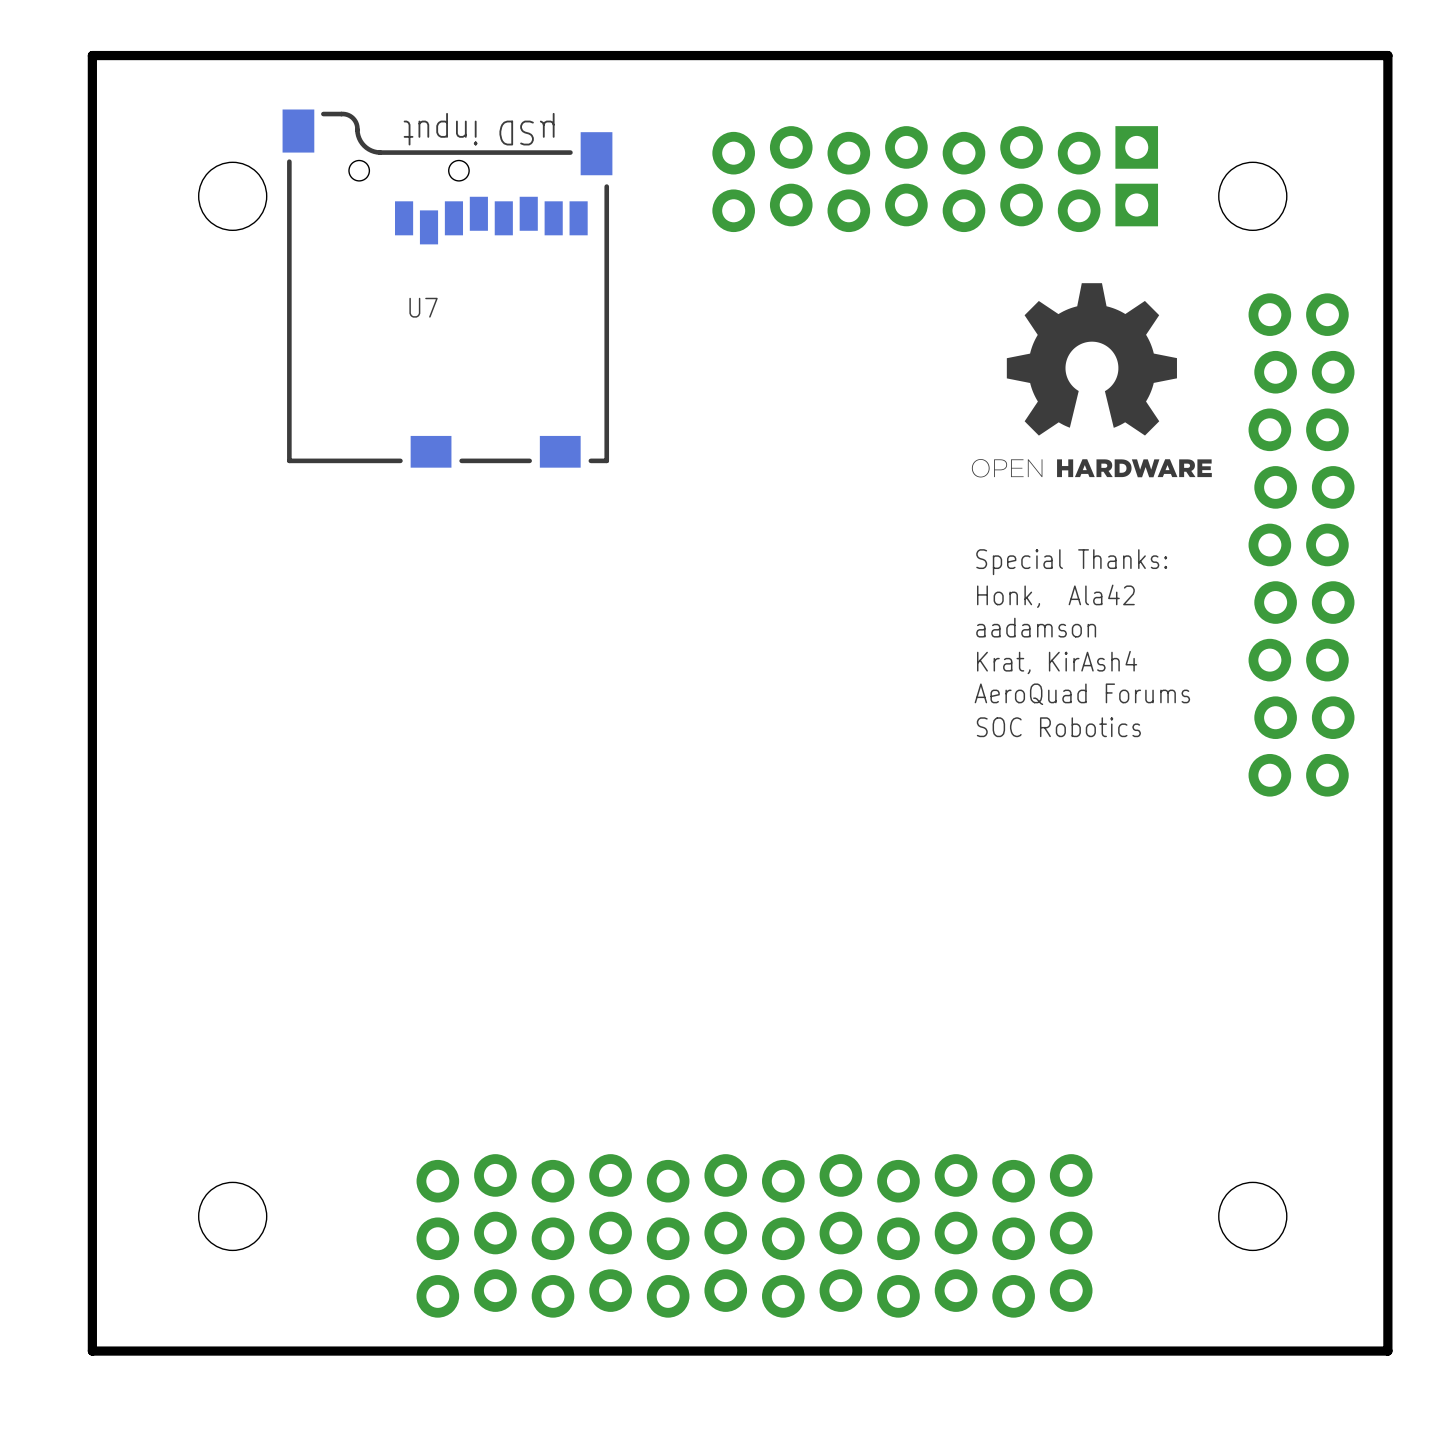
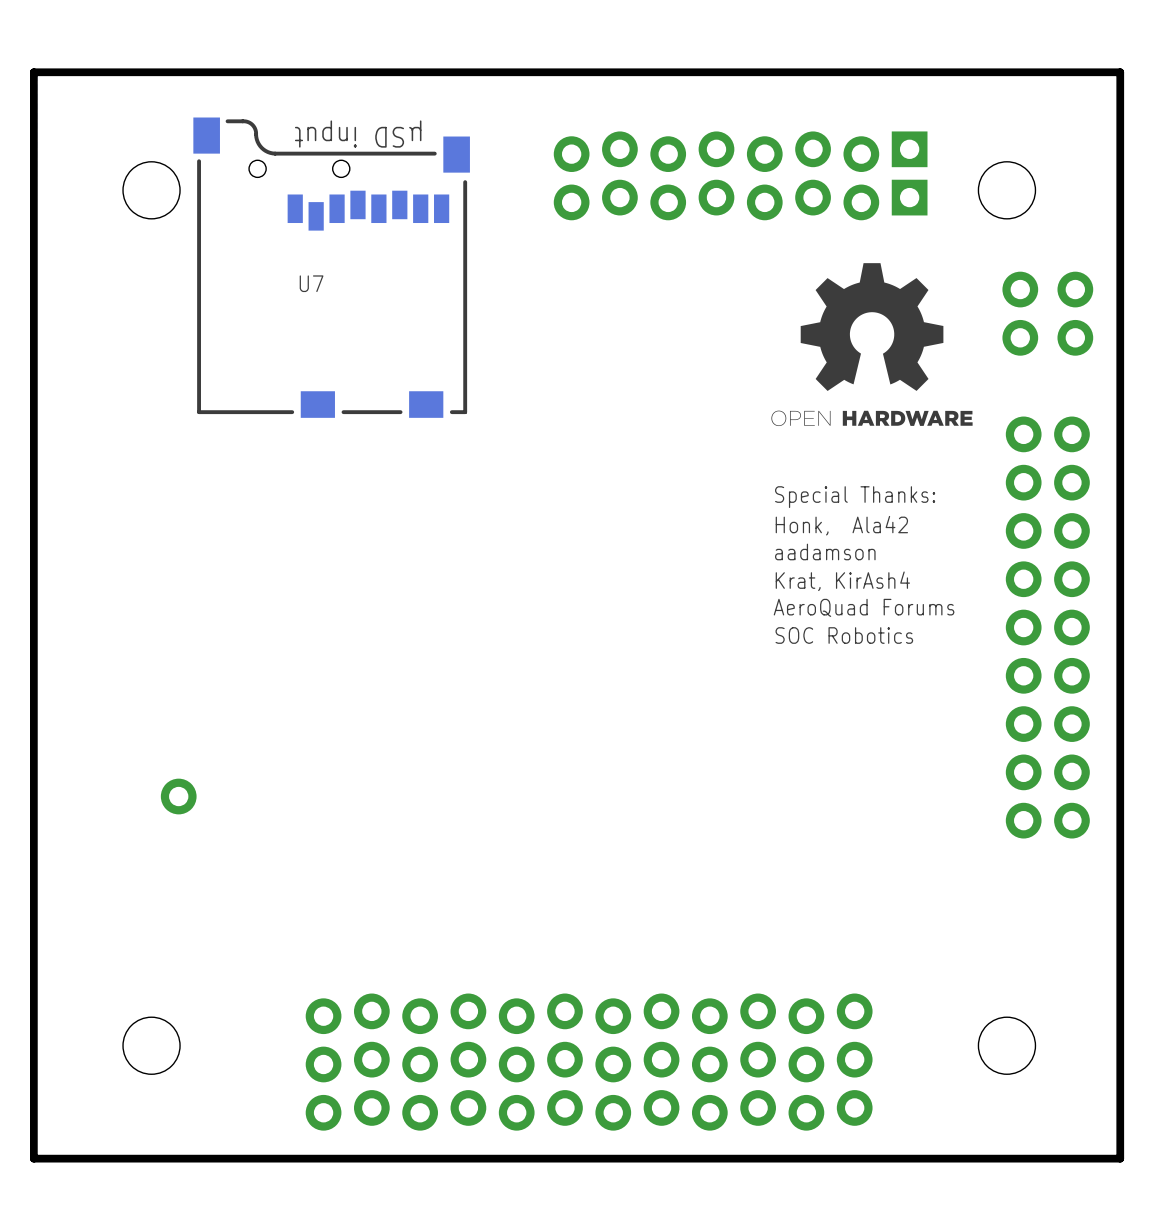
part: none -> (1047, 289)
part: none -> (1047, 337)
part: (1272, 544) -> none
part: (1330, 544) -> none
part: none -> (1023, 627)
part: none -> (1071, 627)
part: none -> (178, 796)

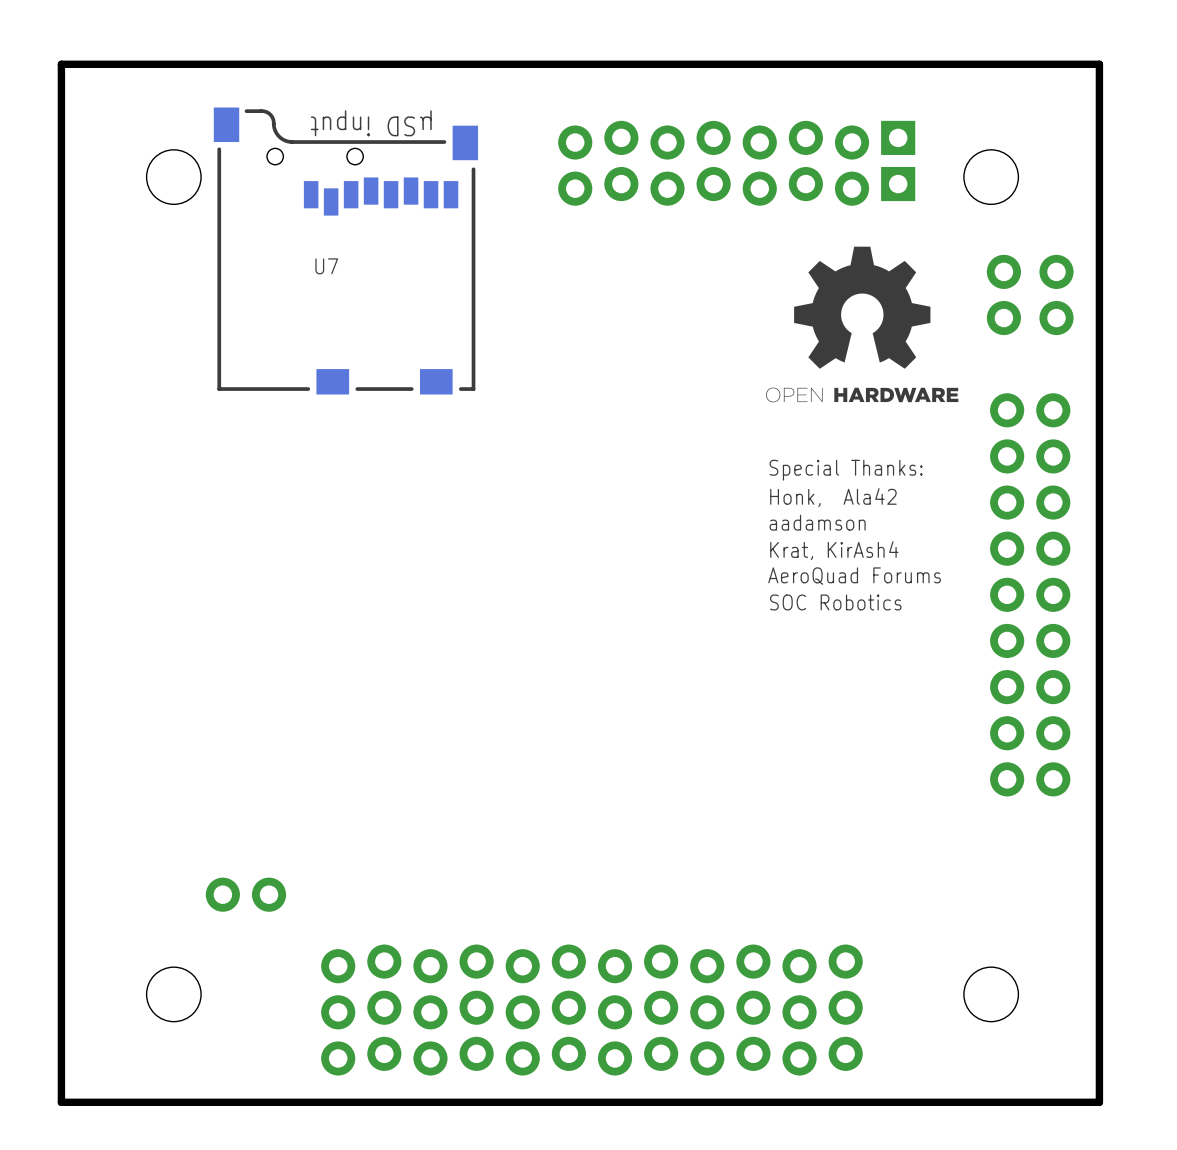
part: (178, 796) -> none
part: none -> (245, 894)

